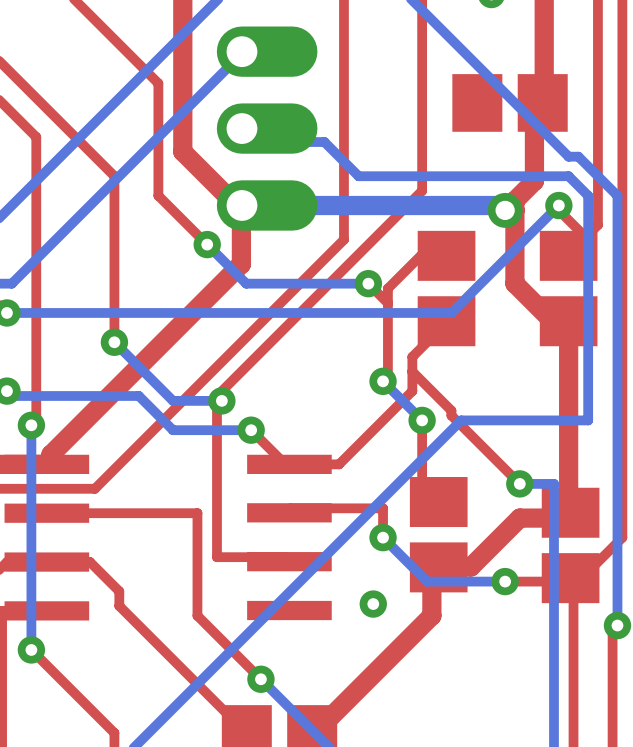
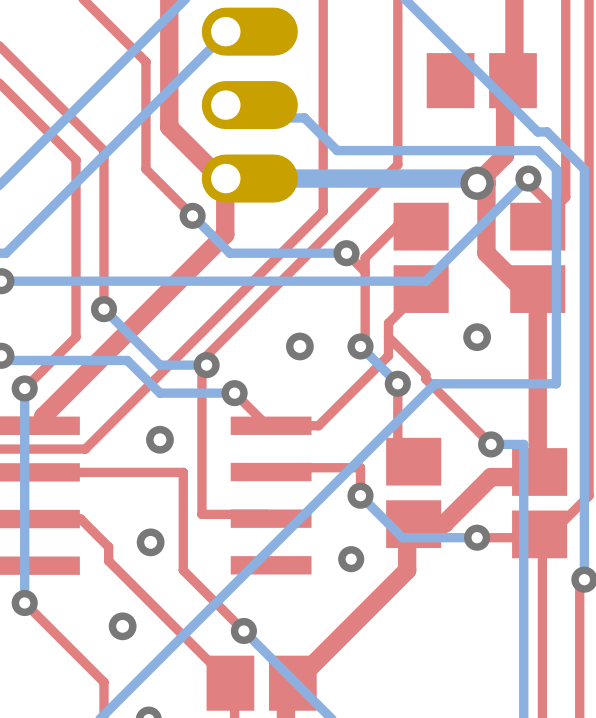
top track: (36, 137) (36, 420) -> (29, 113) (76, 159) (76, 337) (29, 383)
via: none -> (477, 337)
via: none -> (299, 346)
via: none -> (159, 439)
via: none -> (150, 542)
via: none -> (122, 626)

